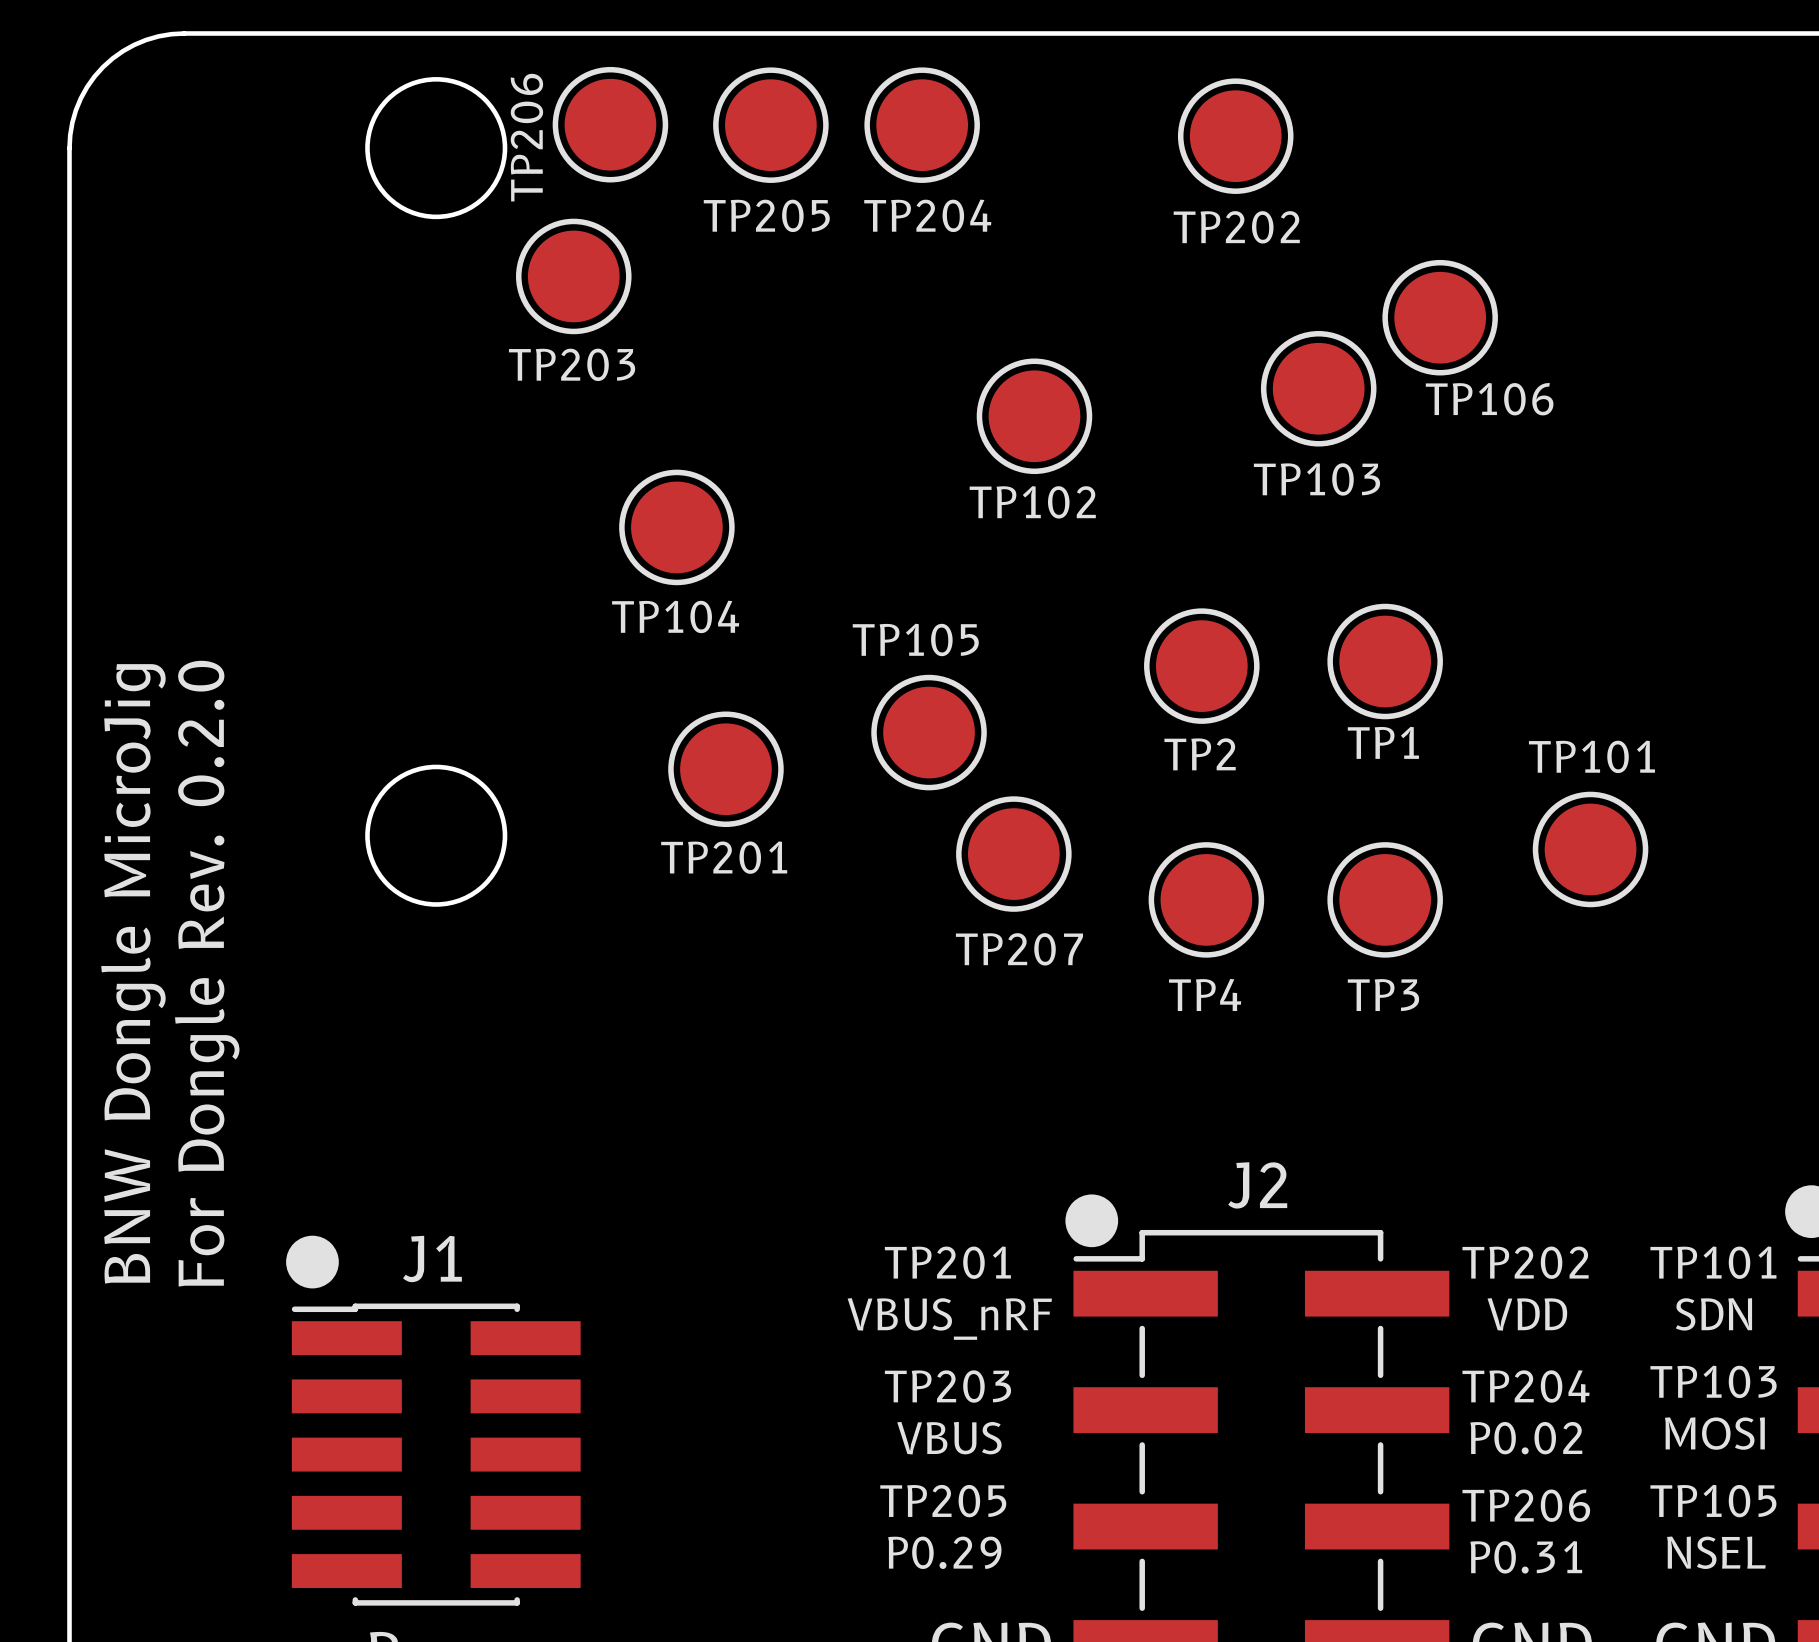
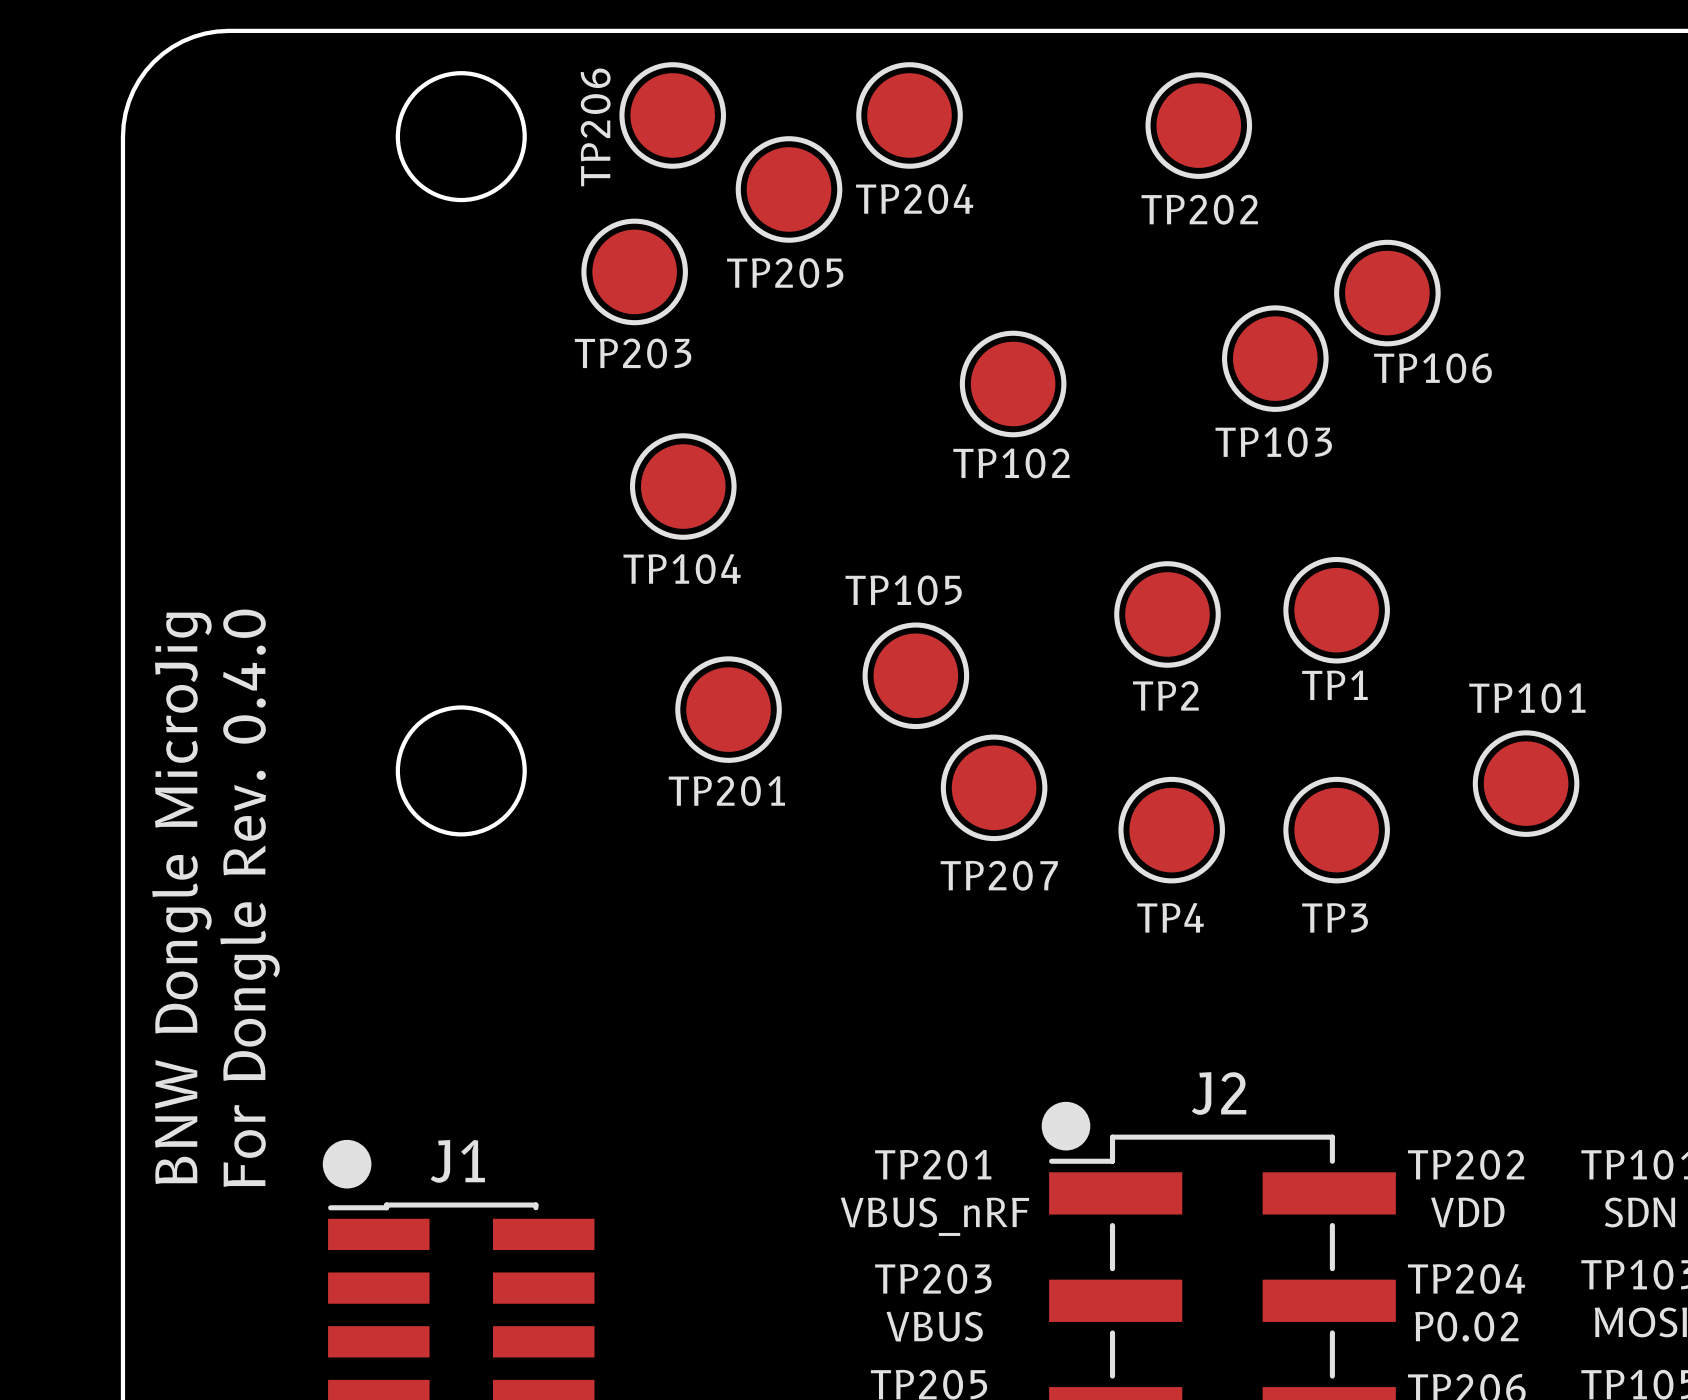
TP206 position: (610, 124) -> (672, 115)
TP205 position: (770, 125) -> (789, 189)
TP203 position: (573, 276) -> (634, 271)
text: For Dongle Rev. 0.2.0 (207, 973) -> For Dongle Rev. 0.4.0 (250, 898)

